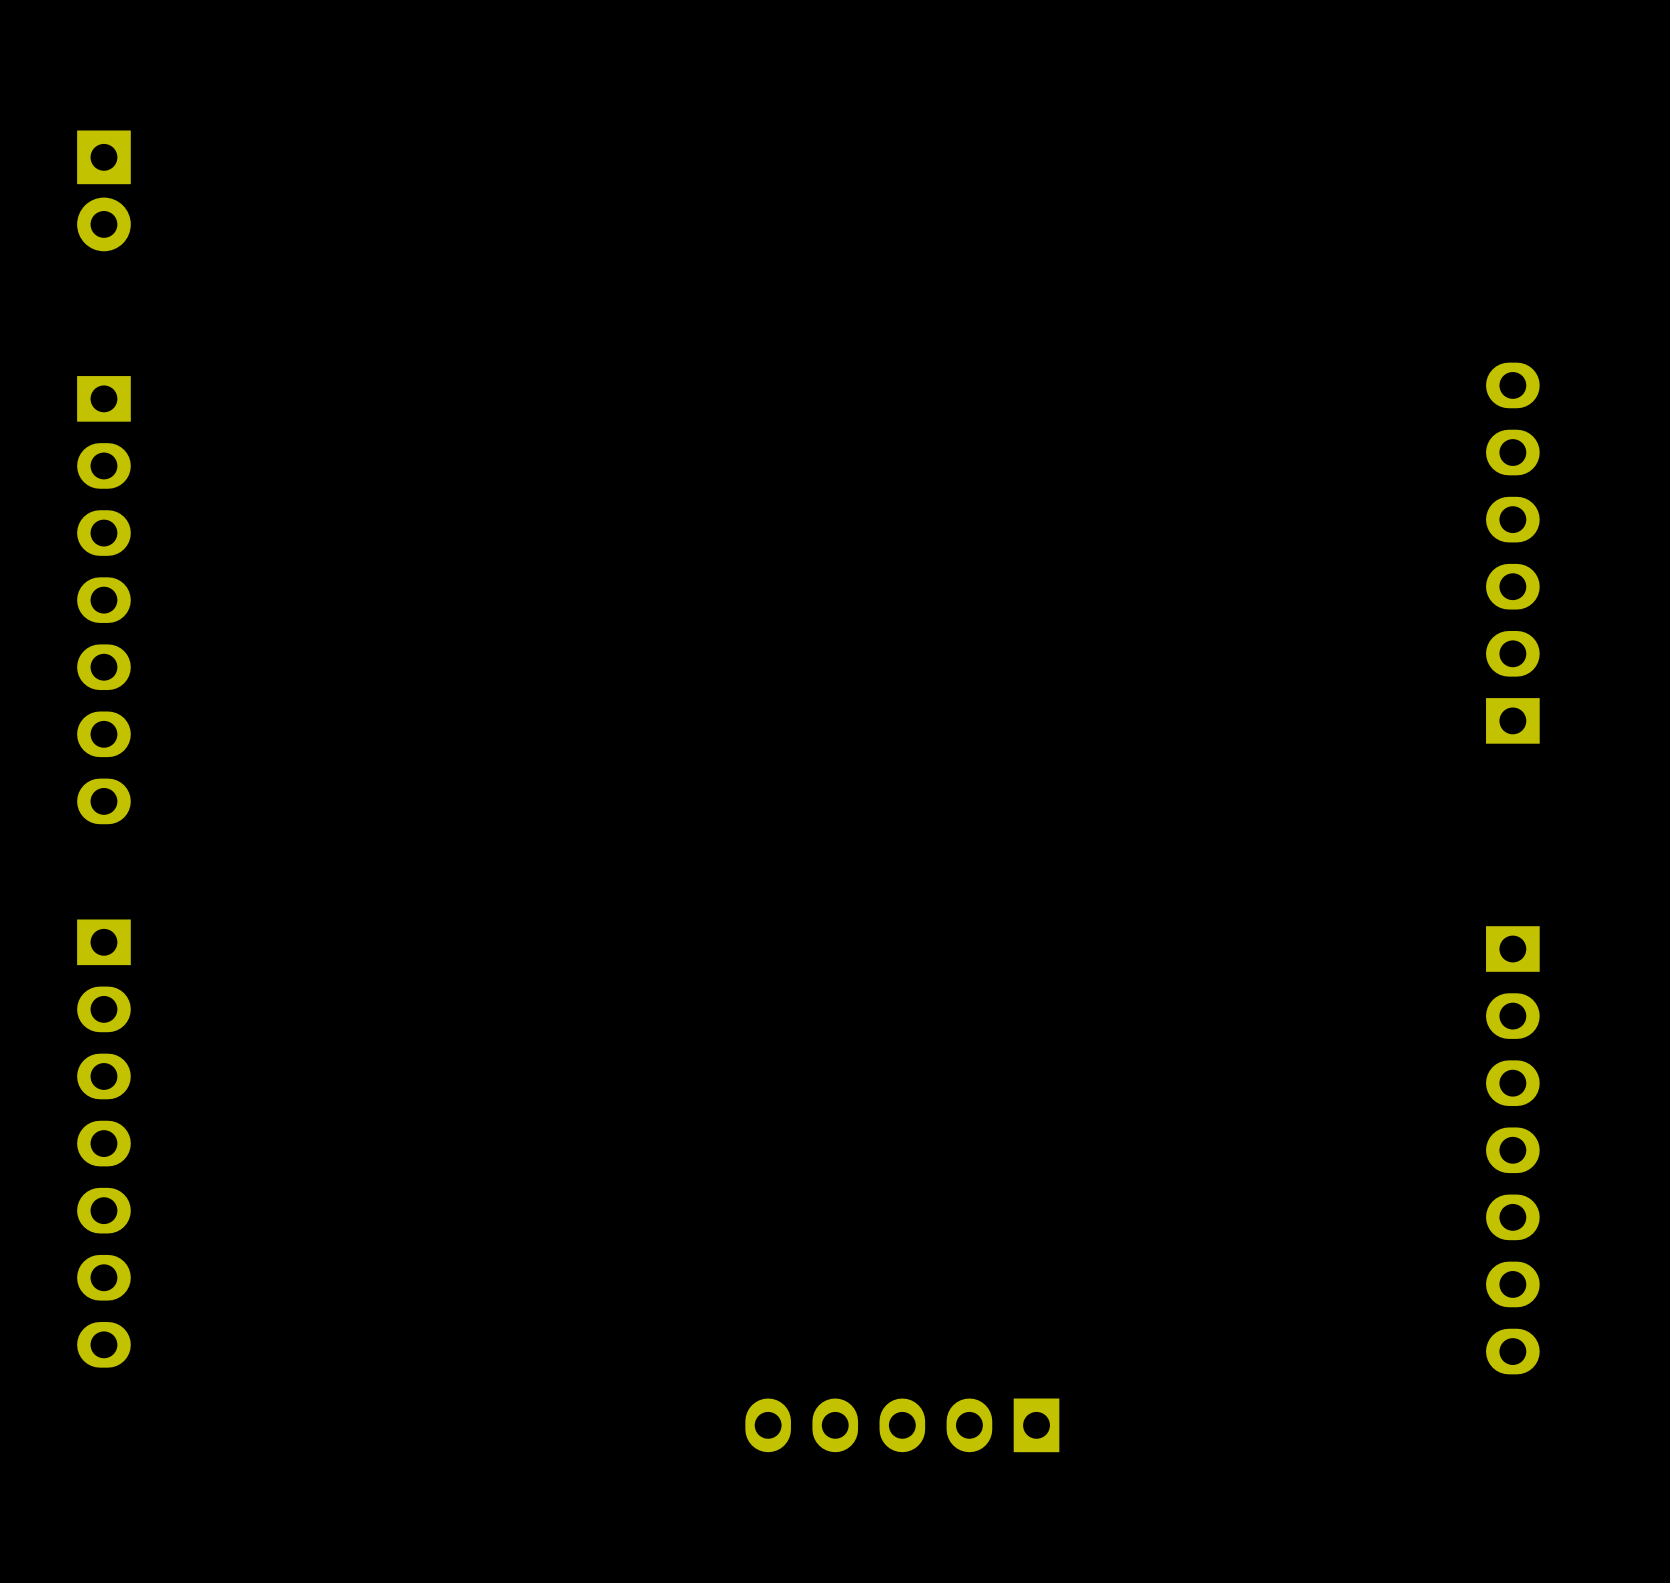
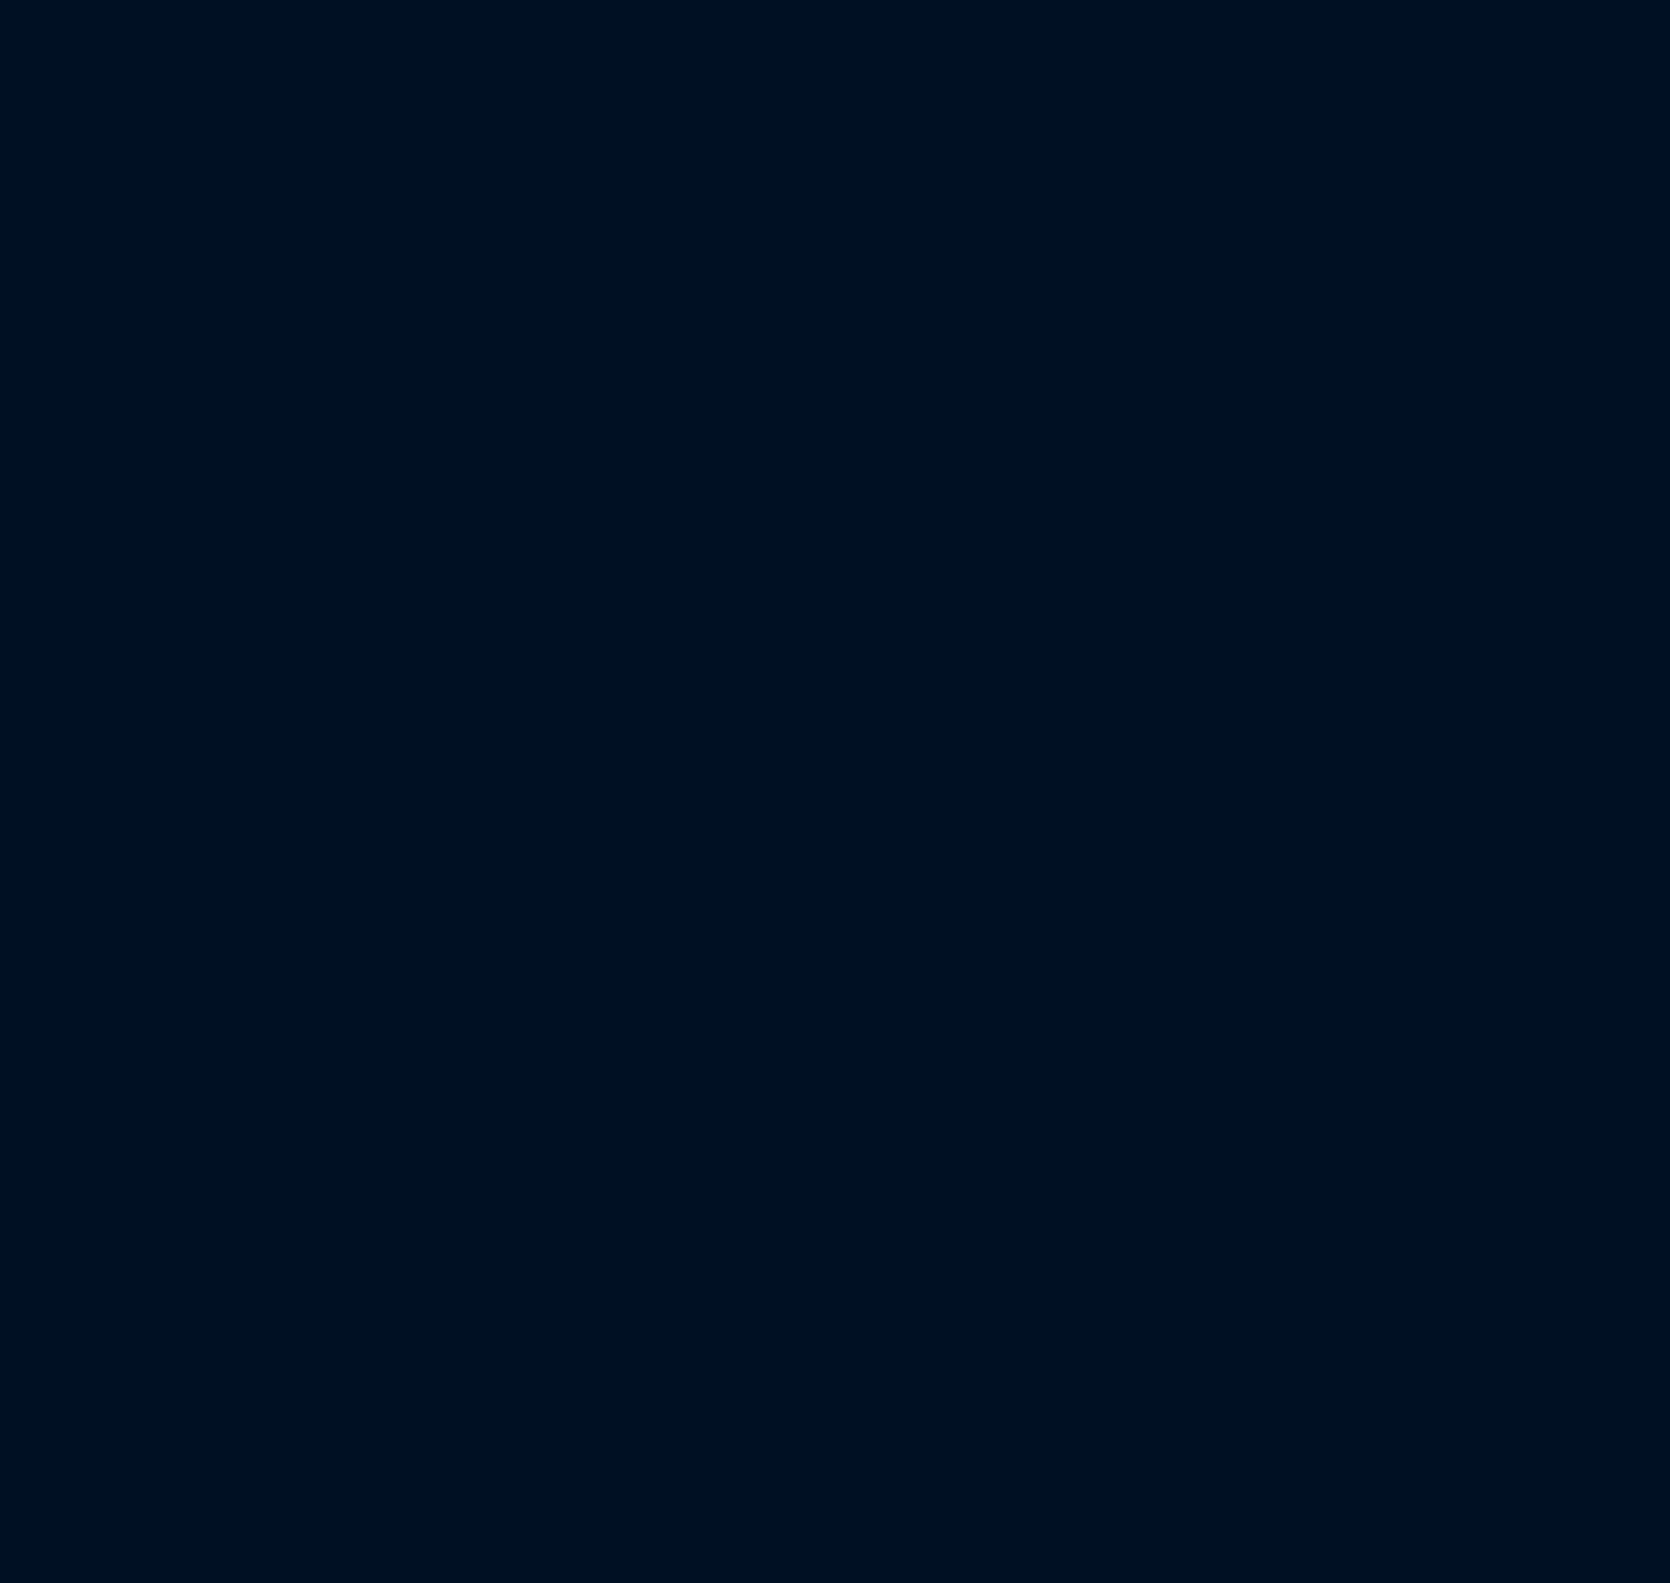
part: (103, 190) -> none
part: (1512, 553) -> none
part: (103, 600) -> none
part: (103, 1143) -> none
part: (1512, 1150) -> none
part: (902, 1425) -> none

